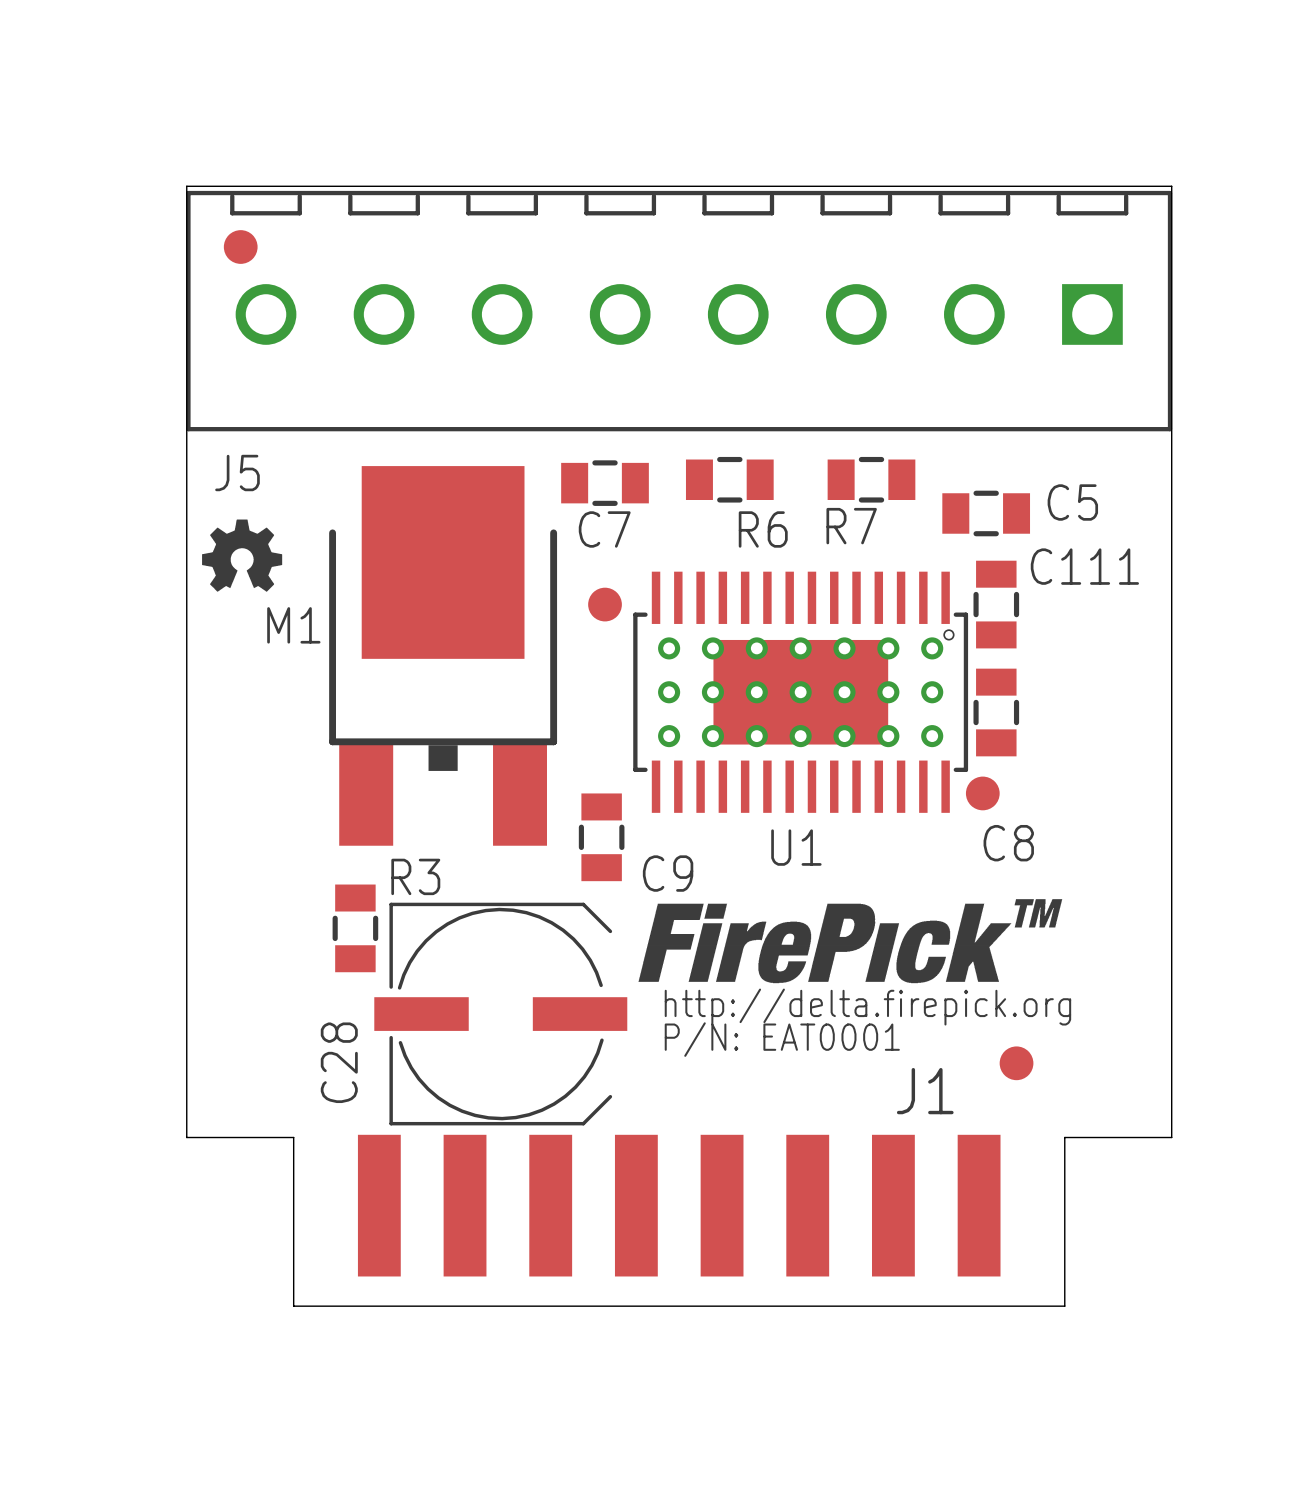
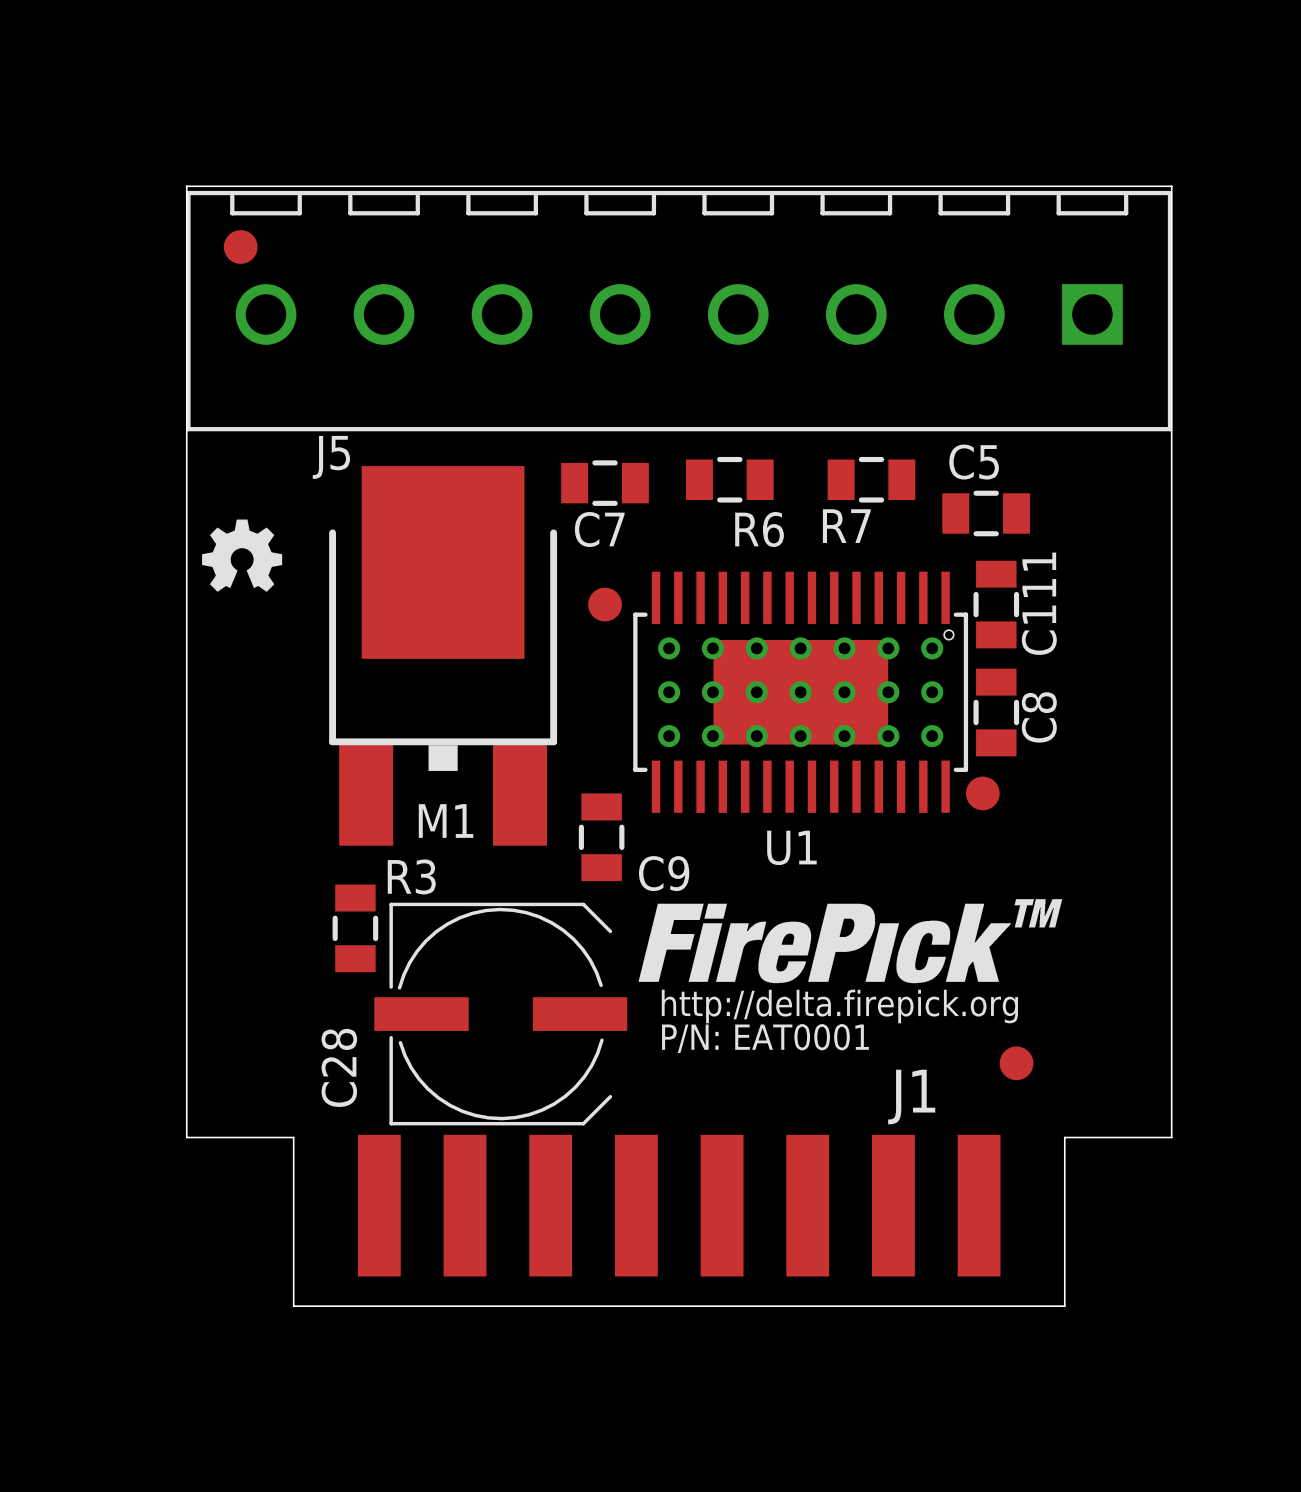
J5 name position: J5 (237, 473) -> J5 (331, 457)
C5 name position: C5 (1072, 502) -> C5 (974, 462)
C111 name rotation: 0° (1084, 566) -> 90° counterclockwise (1039, 603)
M1 name position: M1 (293, 625) -> M1 (446, 821)
C8 name rotation: 0° (1008, 843) -> 90° counterclockwise (1039, 717)
C8 name position: C8 (1008, 843) -> C8 (1039, 717)

